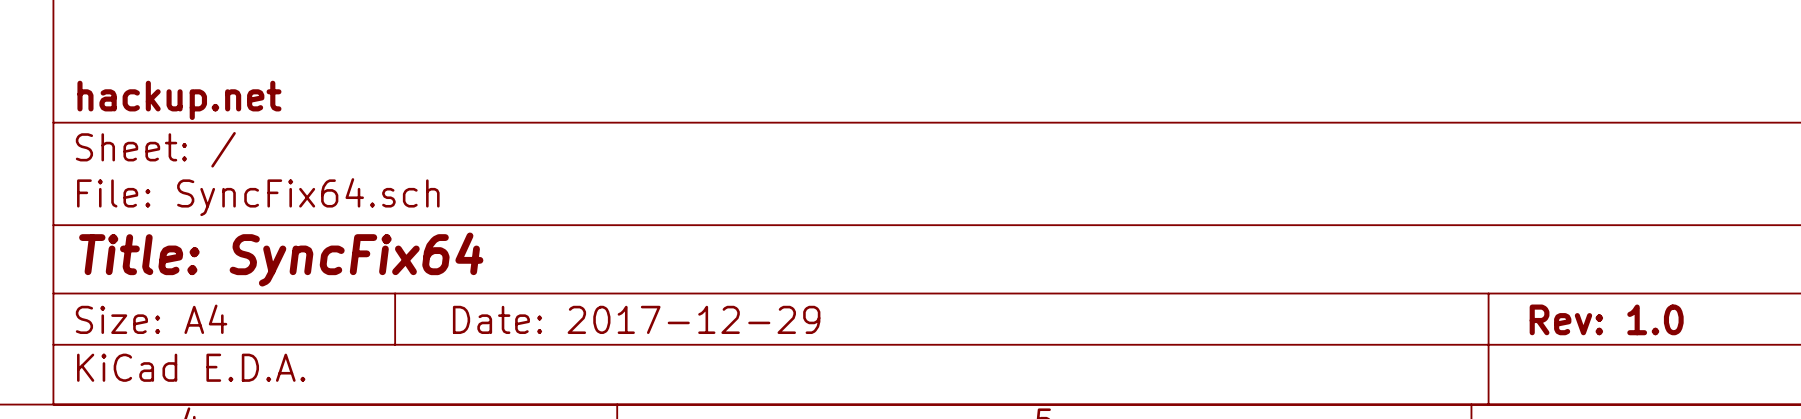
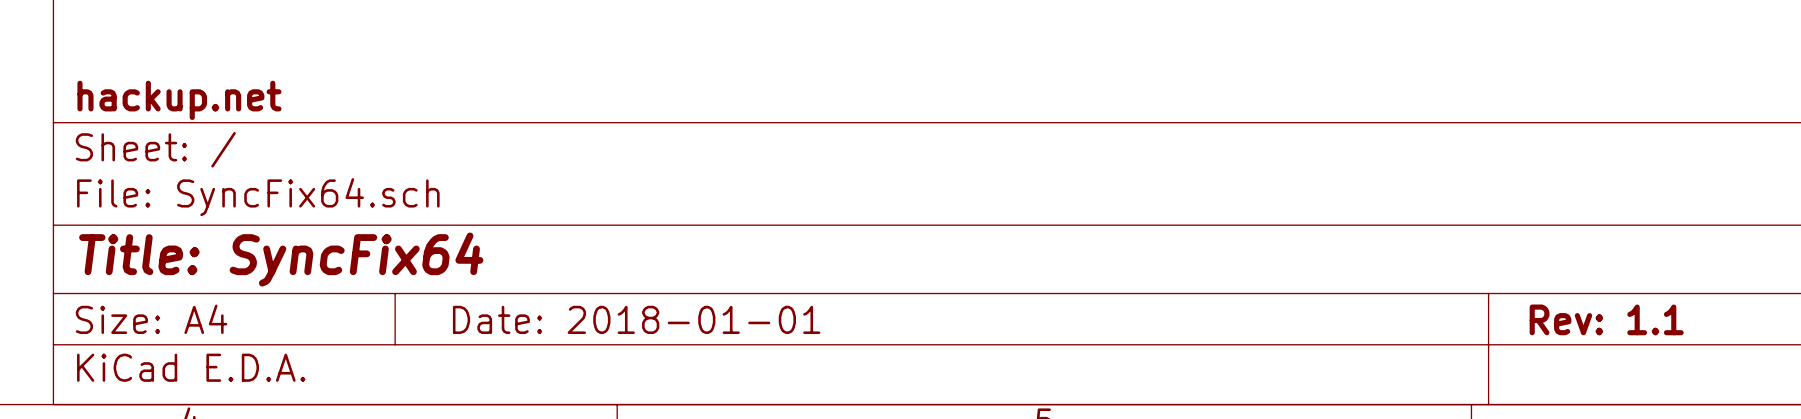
title block: Date: 2017-12-29 (636, 319) -> Date: 2018-01-01 (636, 319)
title block: Rev: 1.0 (1606, 319) -> Rev: 1.1 (1606, 319)

